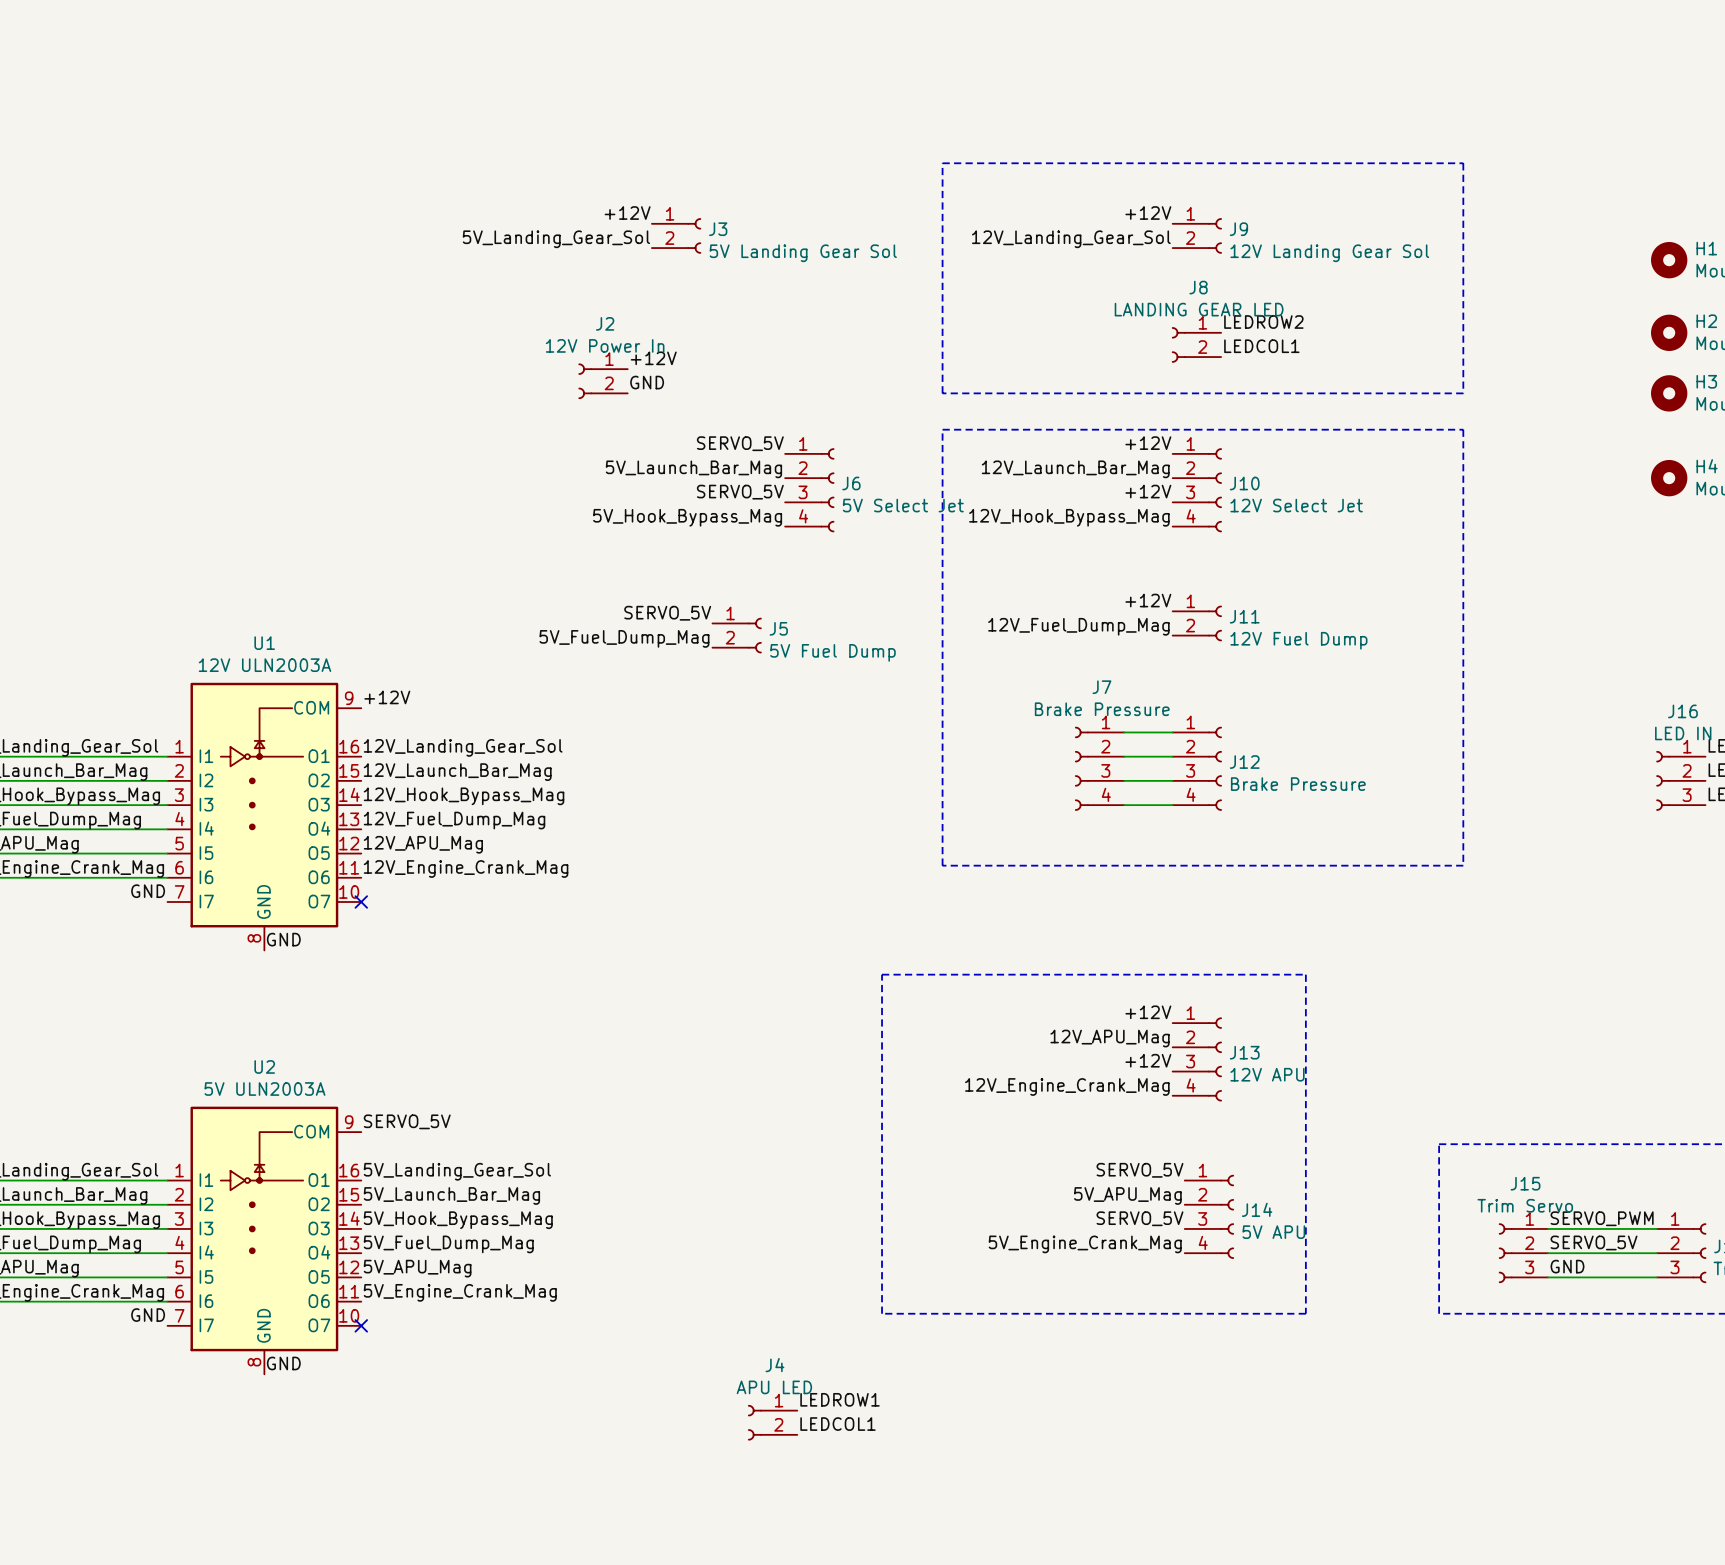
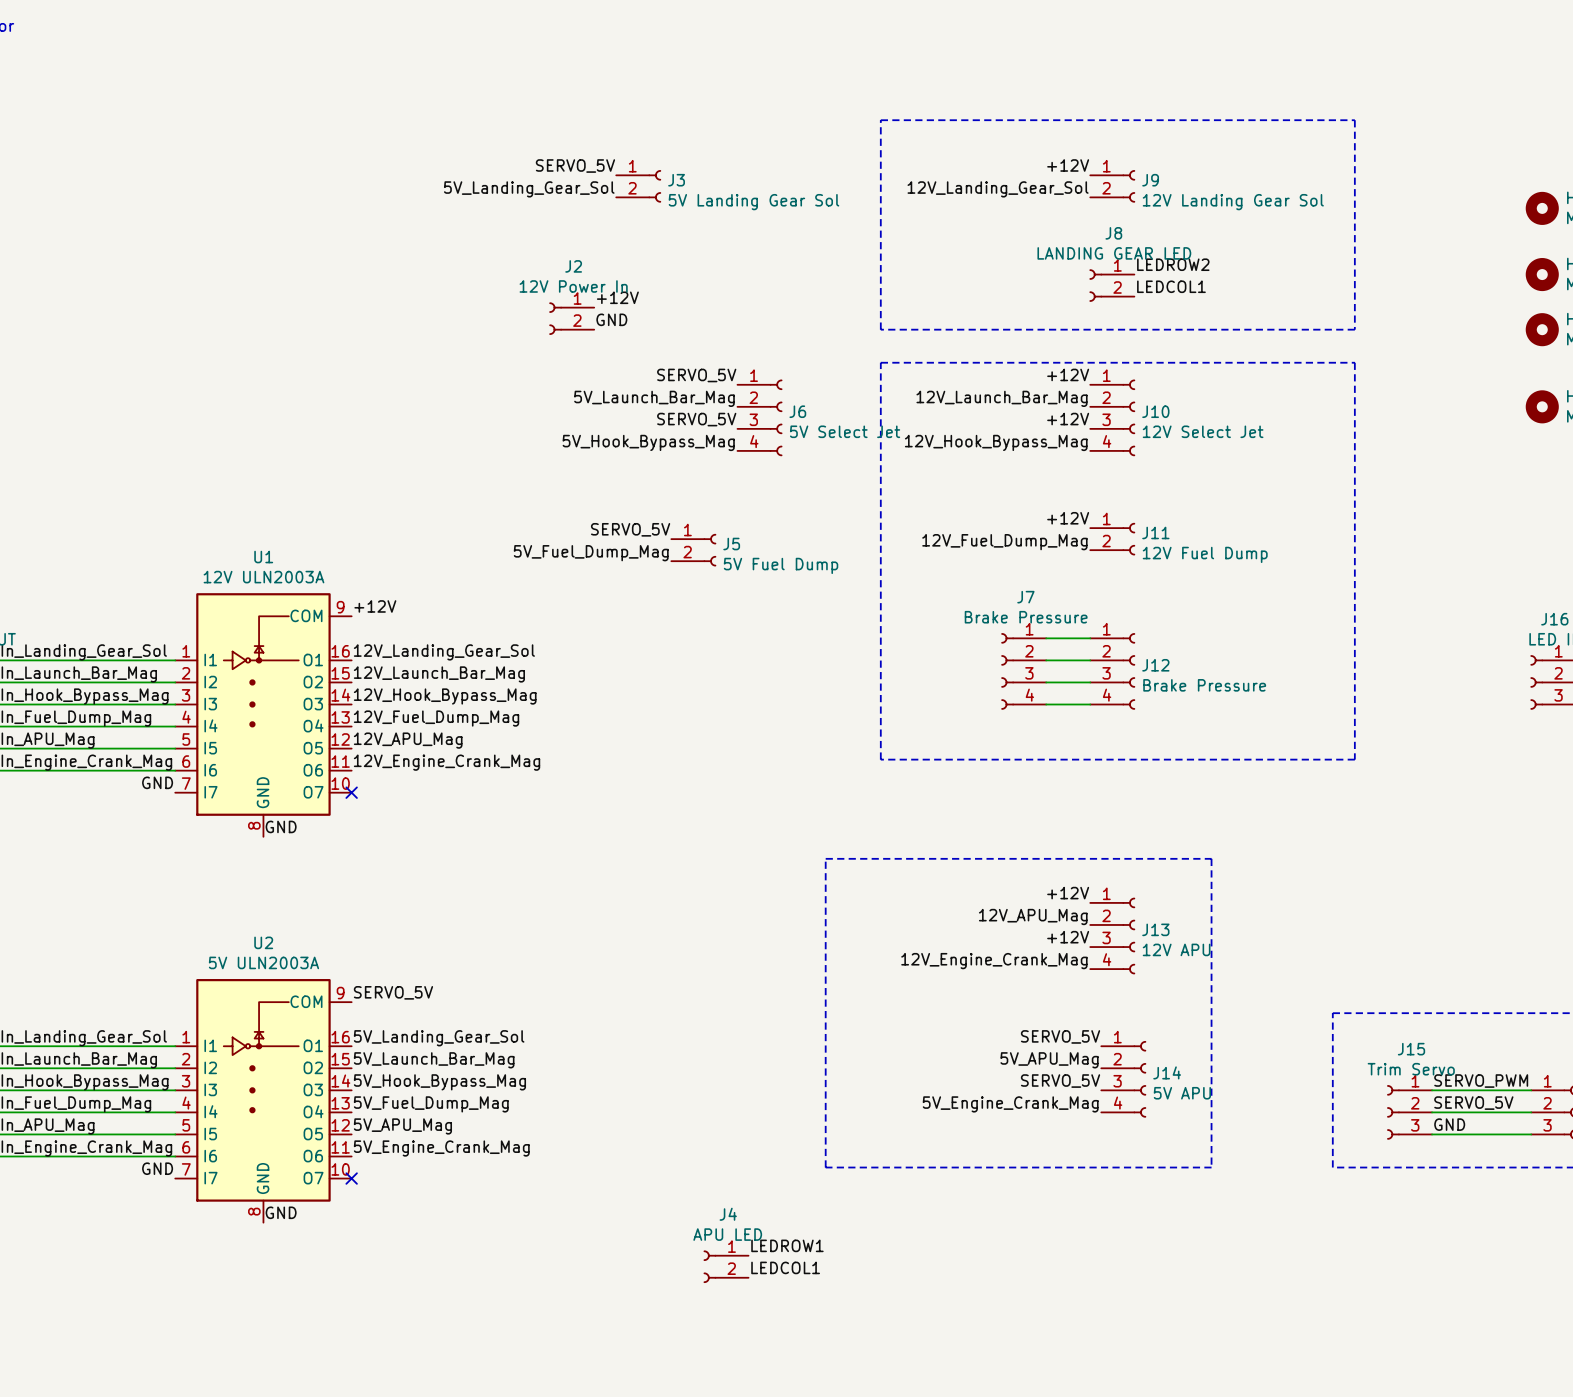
label: +12V (627, 213) -> SERVO_5V (575, 166)

